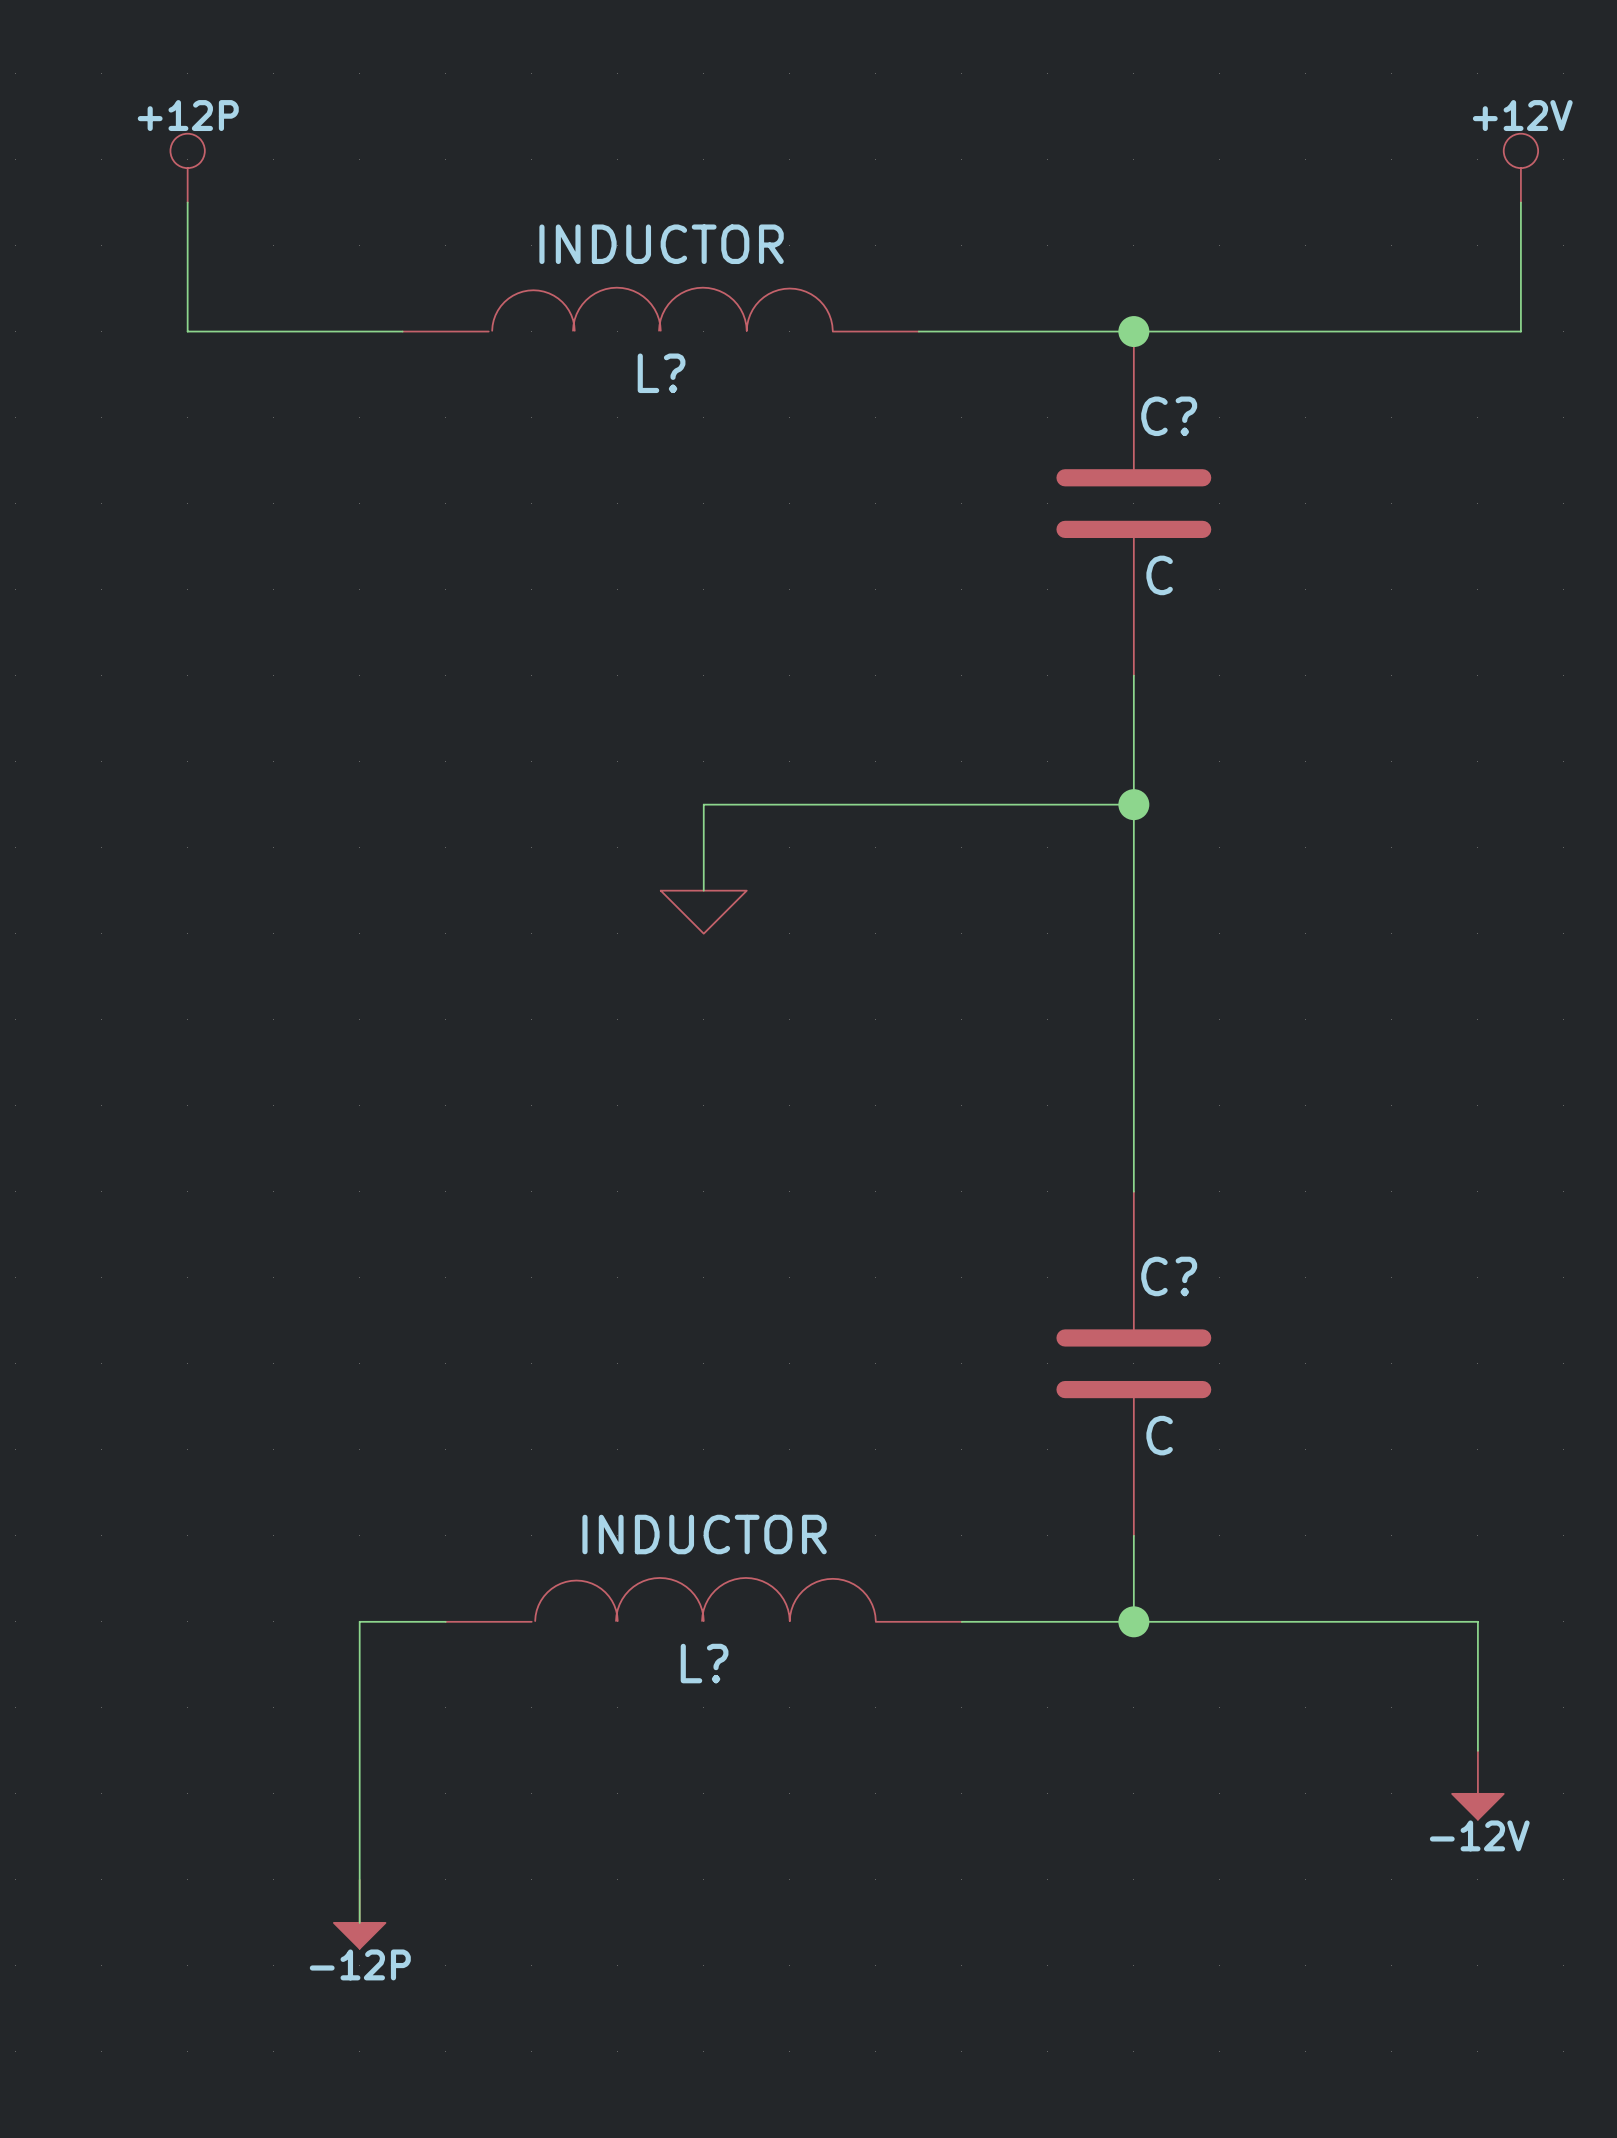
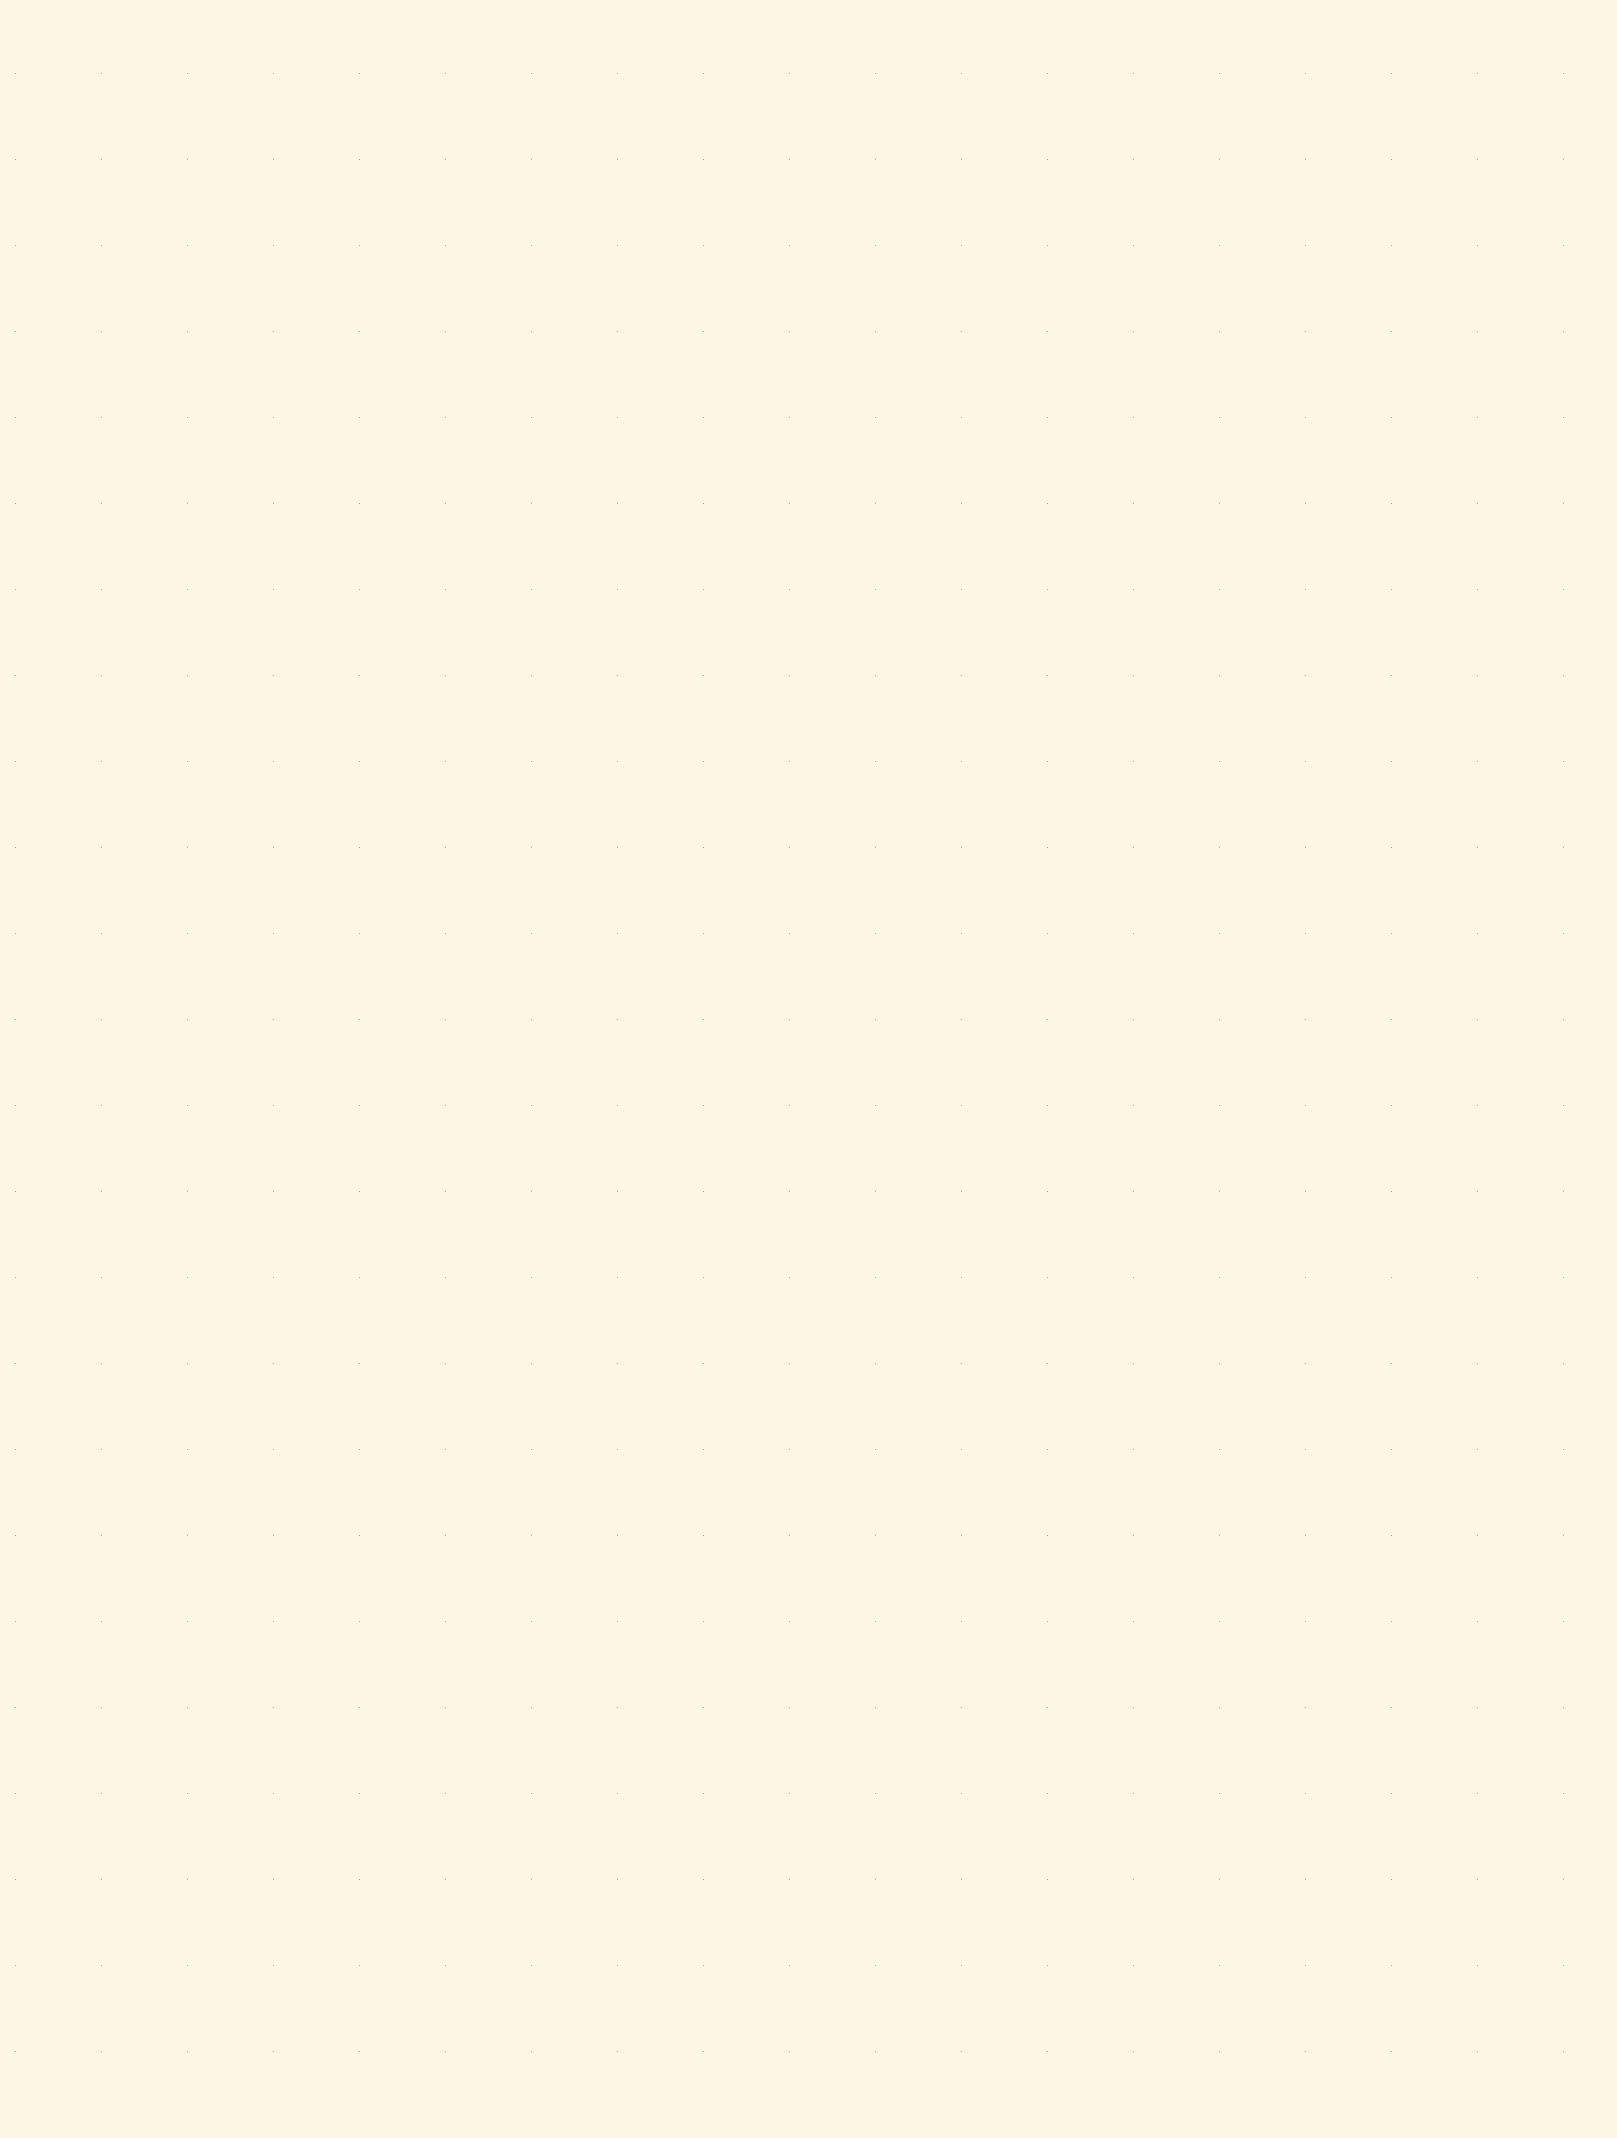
power symbol: +12P (187, 168) -> none
power symbol: +12V (1520, 168) -> none
wire: (187, 202) (187, 331) (402, 331) -> none
wire: (1520, 202) (1520, 331) (918, 331) -> none
L?: INDUCTOR (660, 309) -> none
junction: (1133, 331) -> none
C?: C (1133, 503) -> none
wire: (1133, 675) (1133, 1191) -> none
wire: (1133, 804) (703, 804) (703, 890) -> none
junction: (1133, 804) -> none
power symbol: (703, 912) -> none
C?: C (1133, 1363) -> none
wire: (1133, 1535) (1133, 1621) -> none
L?: INDUCTOR (703, 1599) -> none
wire: (445, 1621) (359, 1621) (359, 1922) -> none
wire: (961, 1621) (1477, 1621) (1477, 1750) -> none
junction: (1133, 1621) -> none
power symbol: -12V (1477, 1785) -> none
power symbol: -12P (359, 1914) -> none

